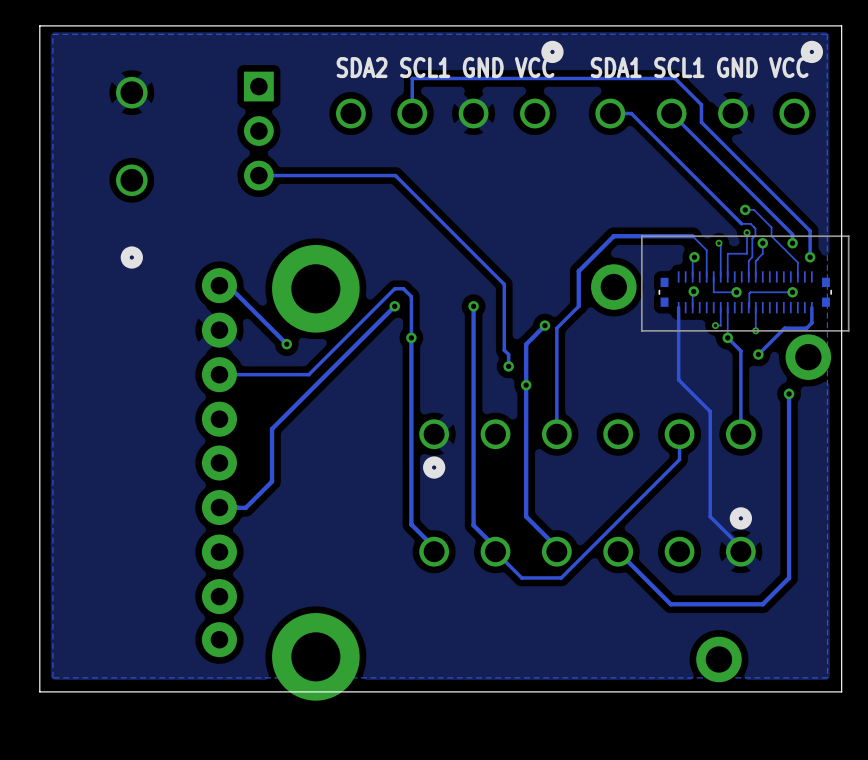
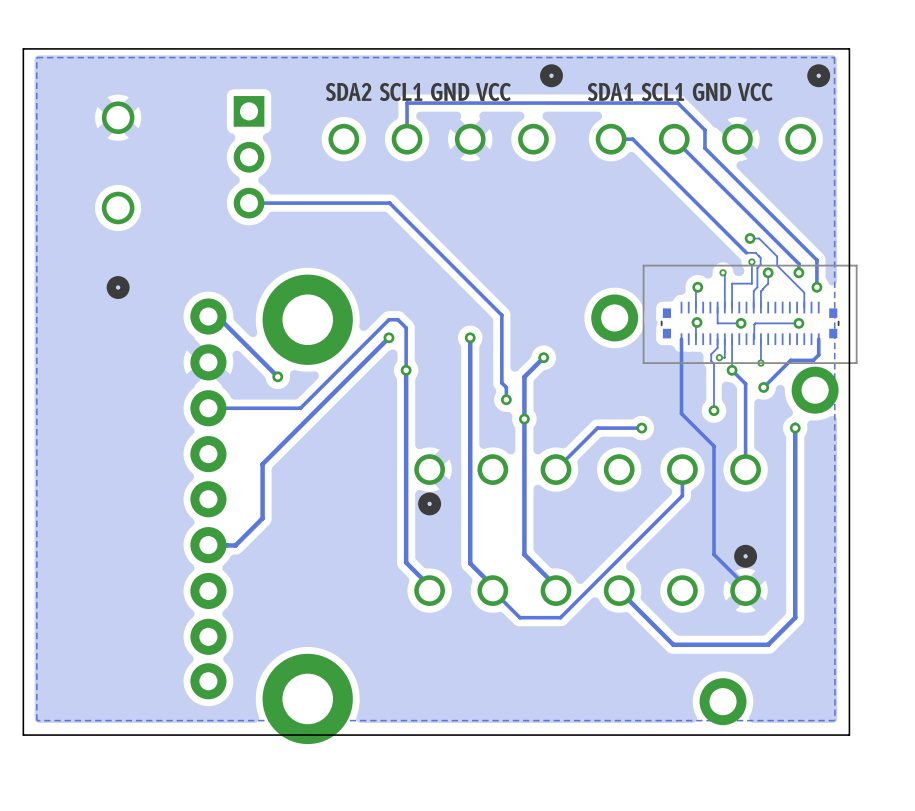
track: (706, 276) (706, 250) (692, 236) (613, 236) (578, 271) (578, 306) (556, 328) (556, 434) -> (641, 428) (597, 428) (556, 469)
track: none -> (717, 339) (717, 347) (711, 354) (711, 361) (714, 363) (714, 410)
via: none -> (714, 410)
via: none -> (641, 428)

